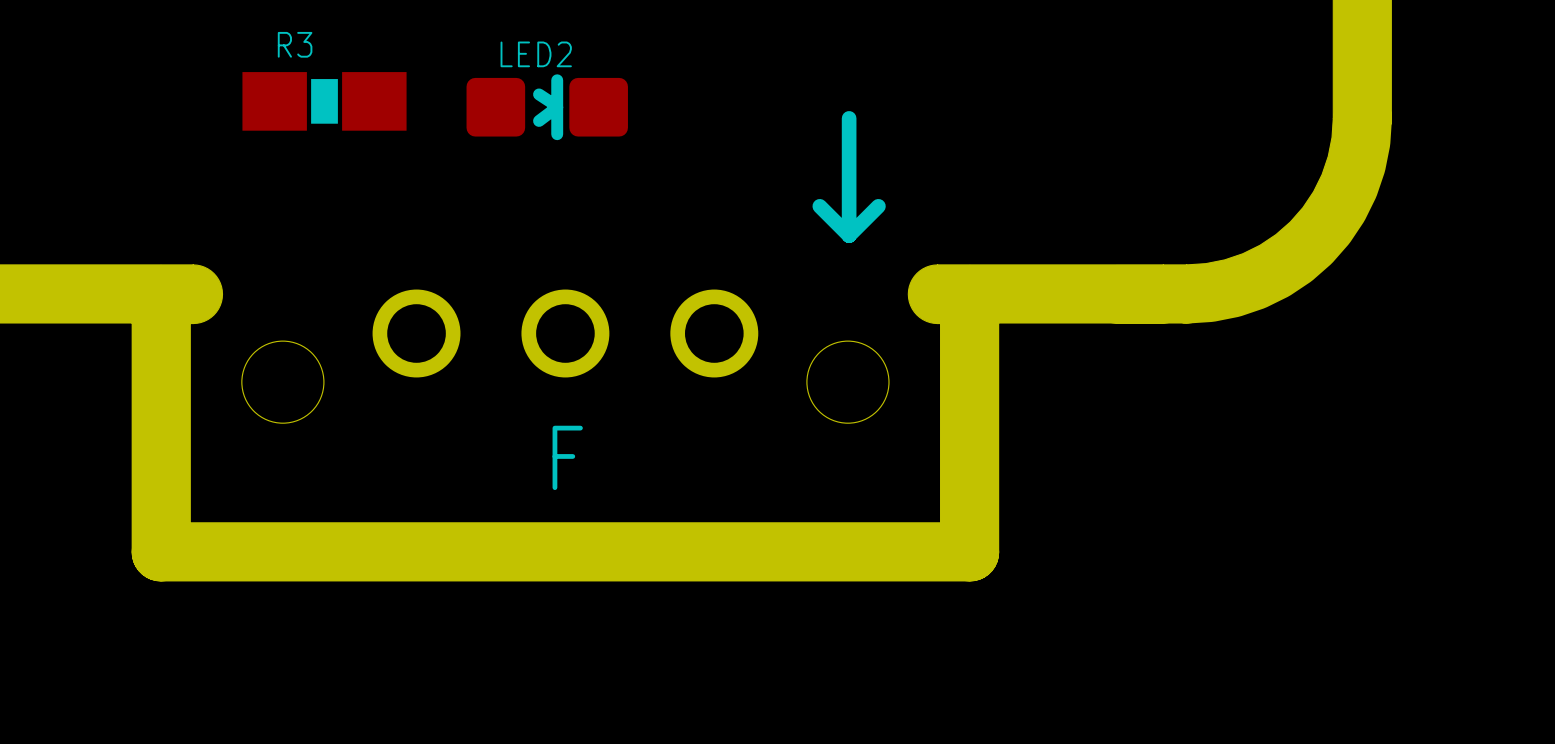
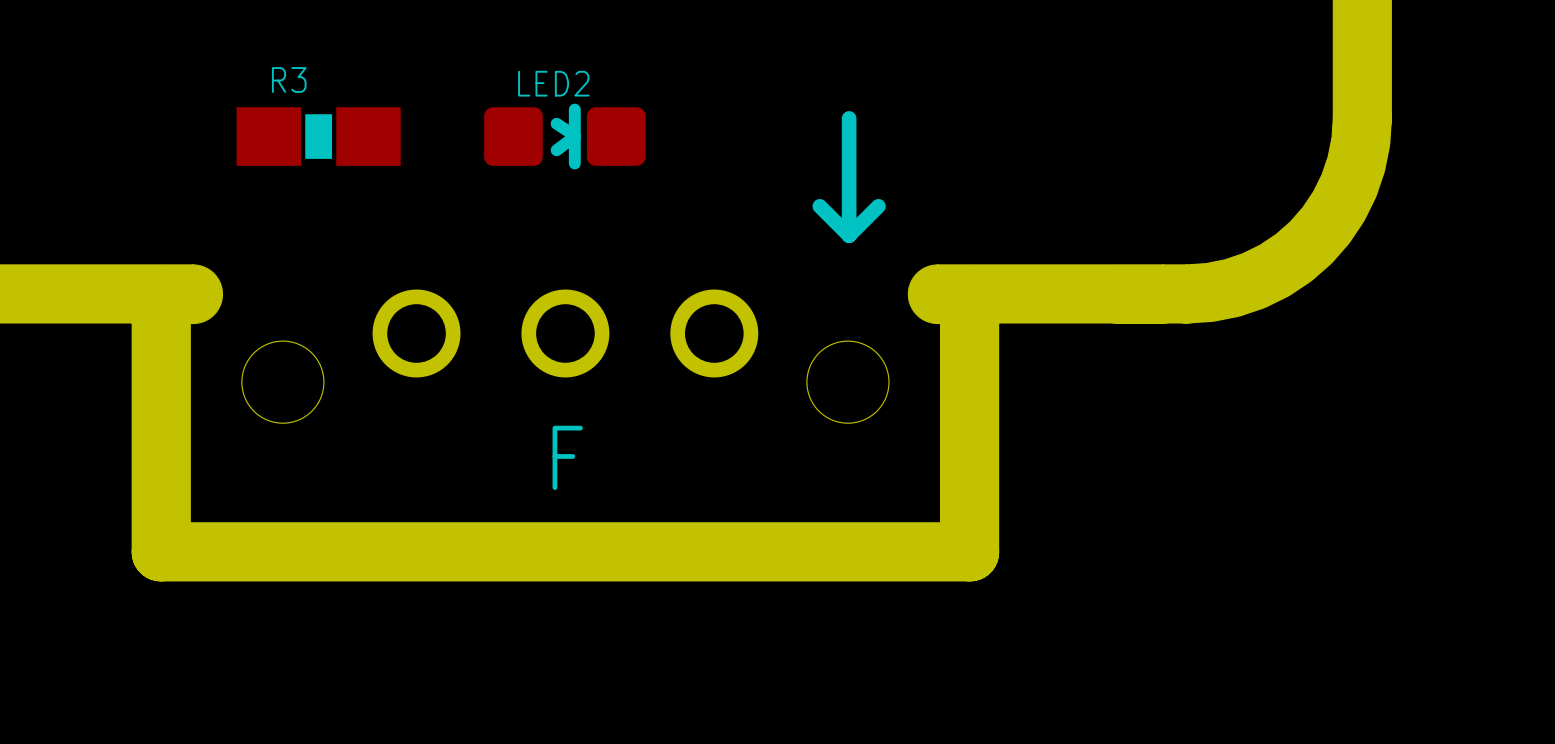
R3 position: (324, 101) -> (318, 136)
LED2 position: (547, 107) -> (564, 136)

